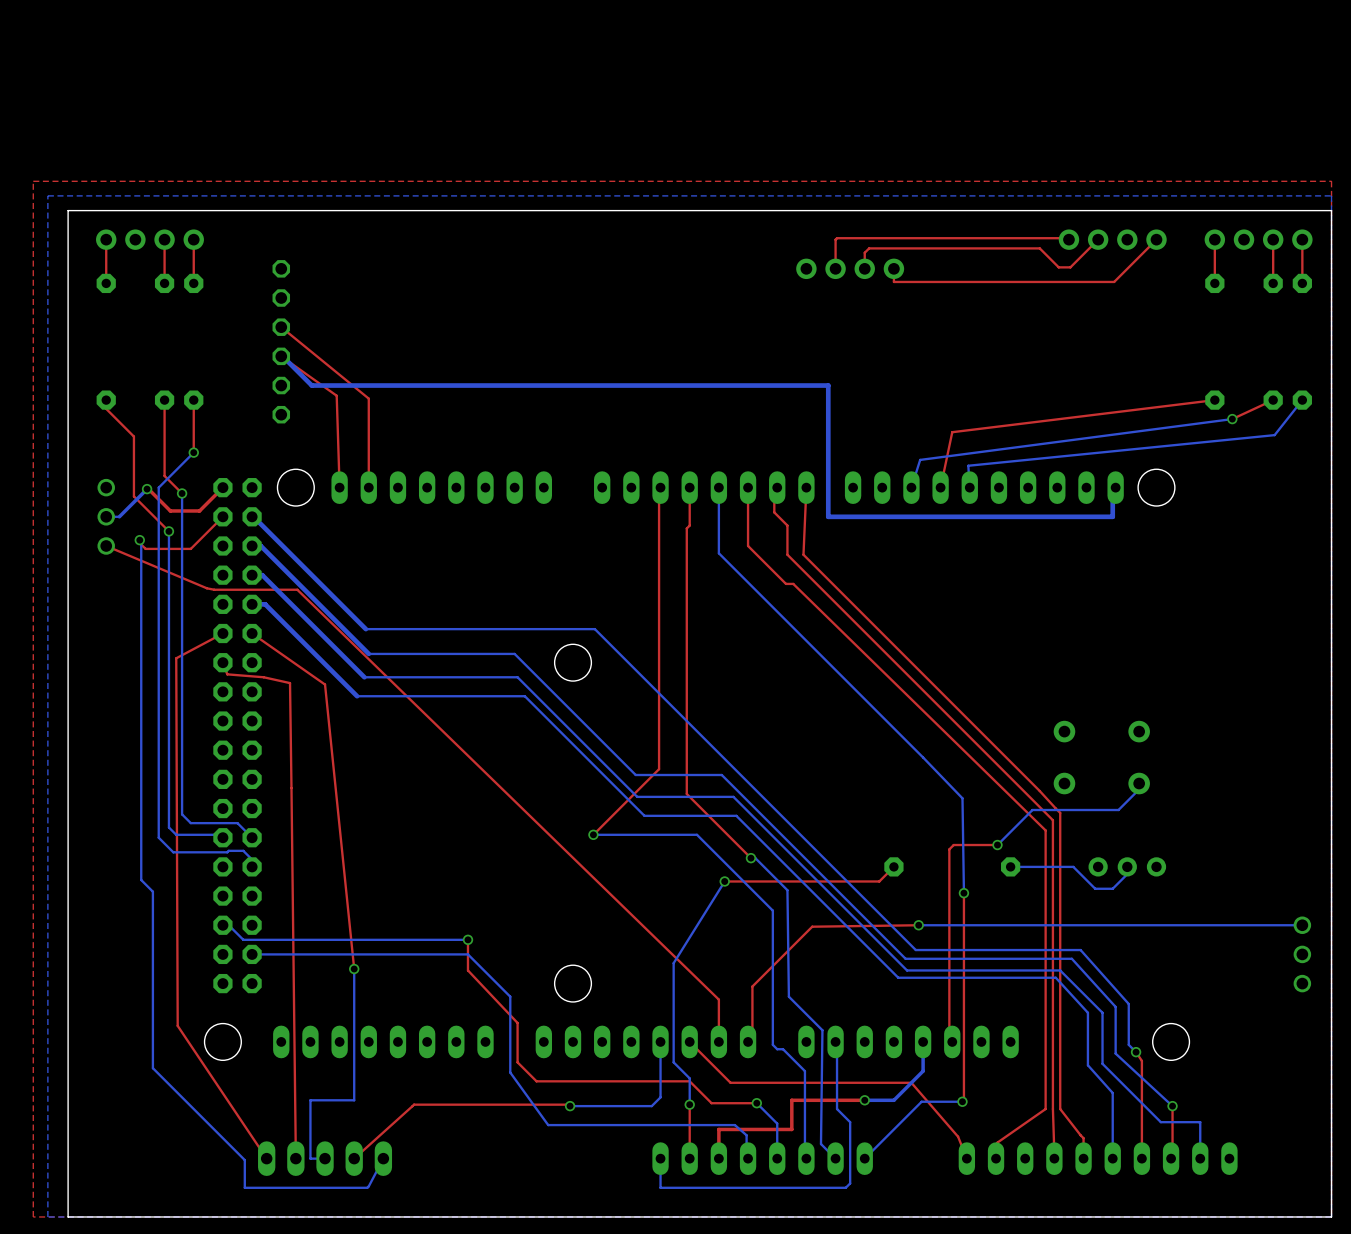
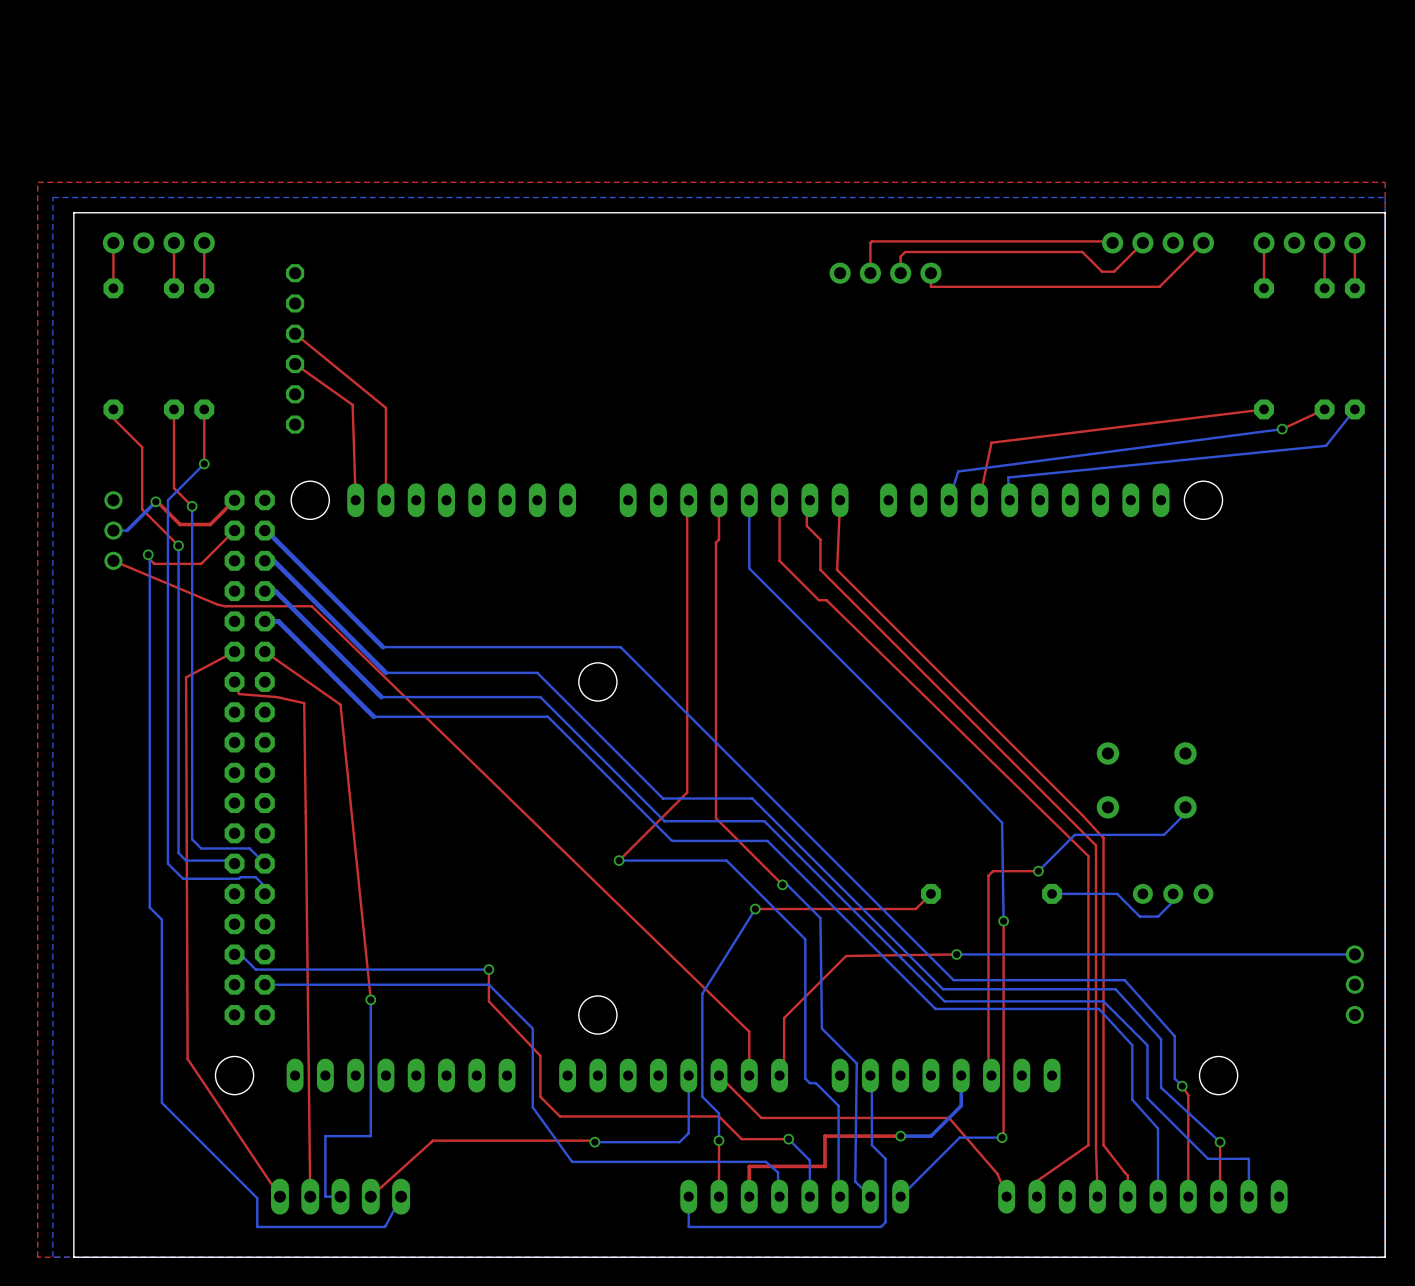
bottom track: (286, 359) (311, 385) (828, 385) (828, 516) (1112, 516) (1112, 487) (1115, 487) -> none

